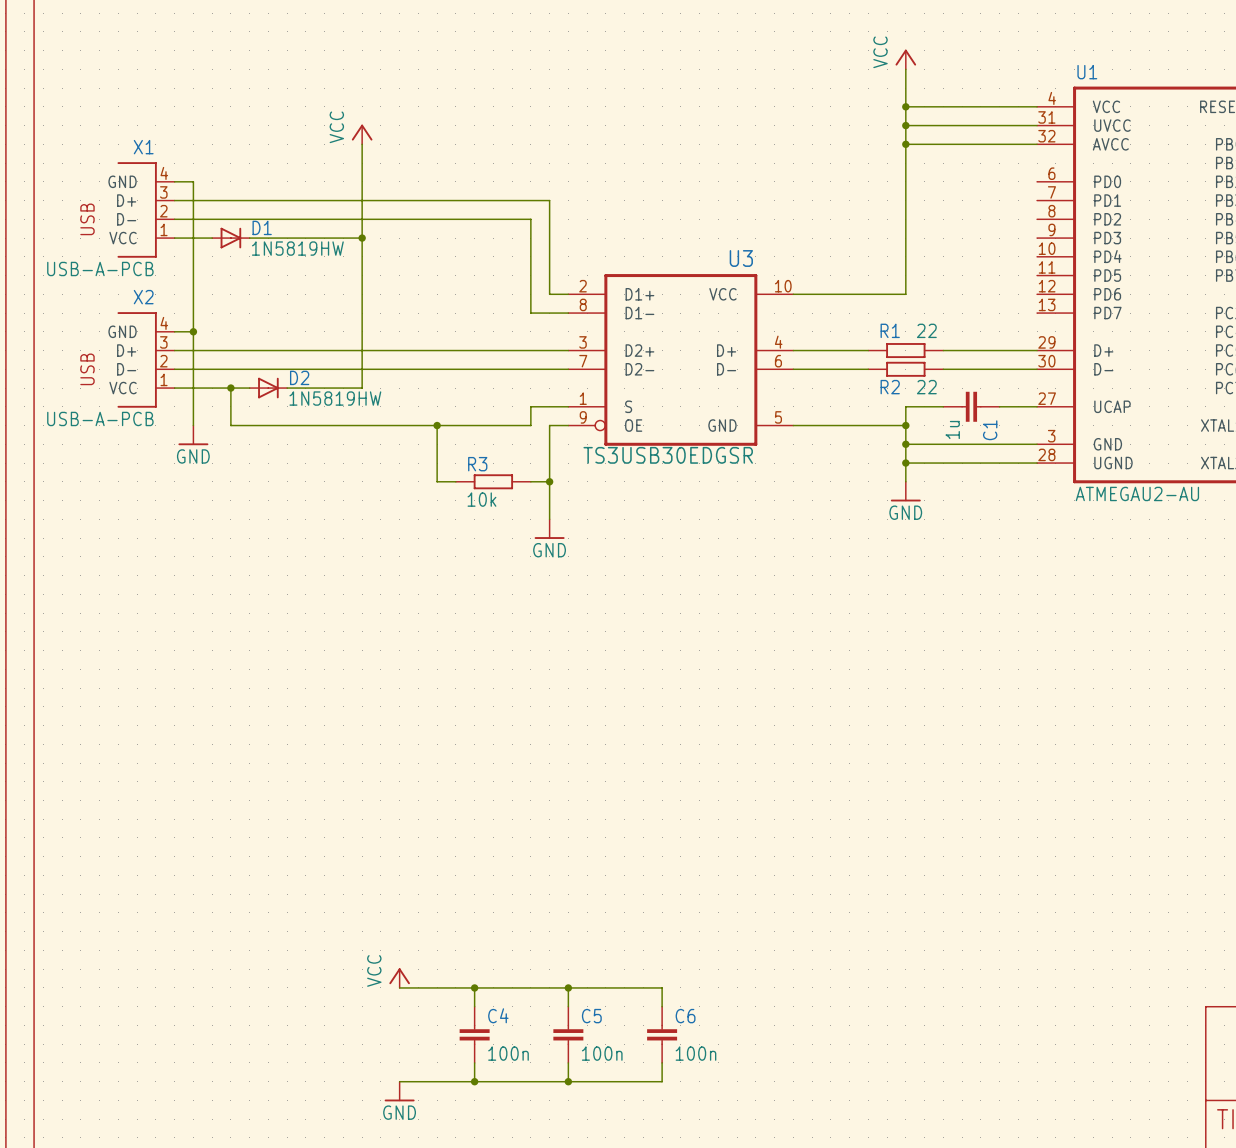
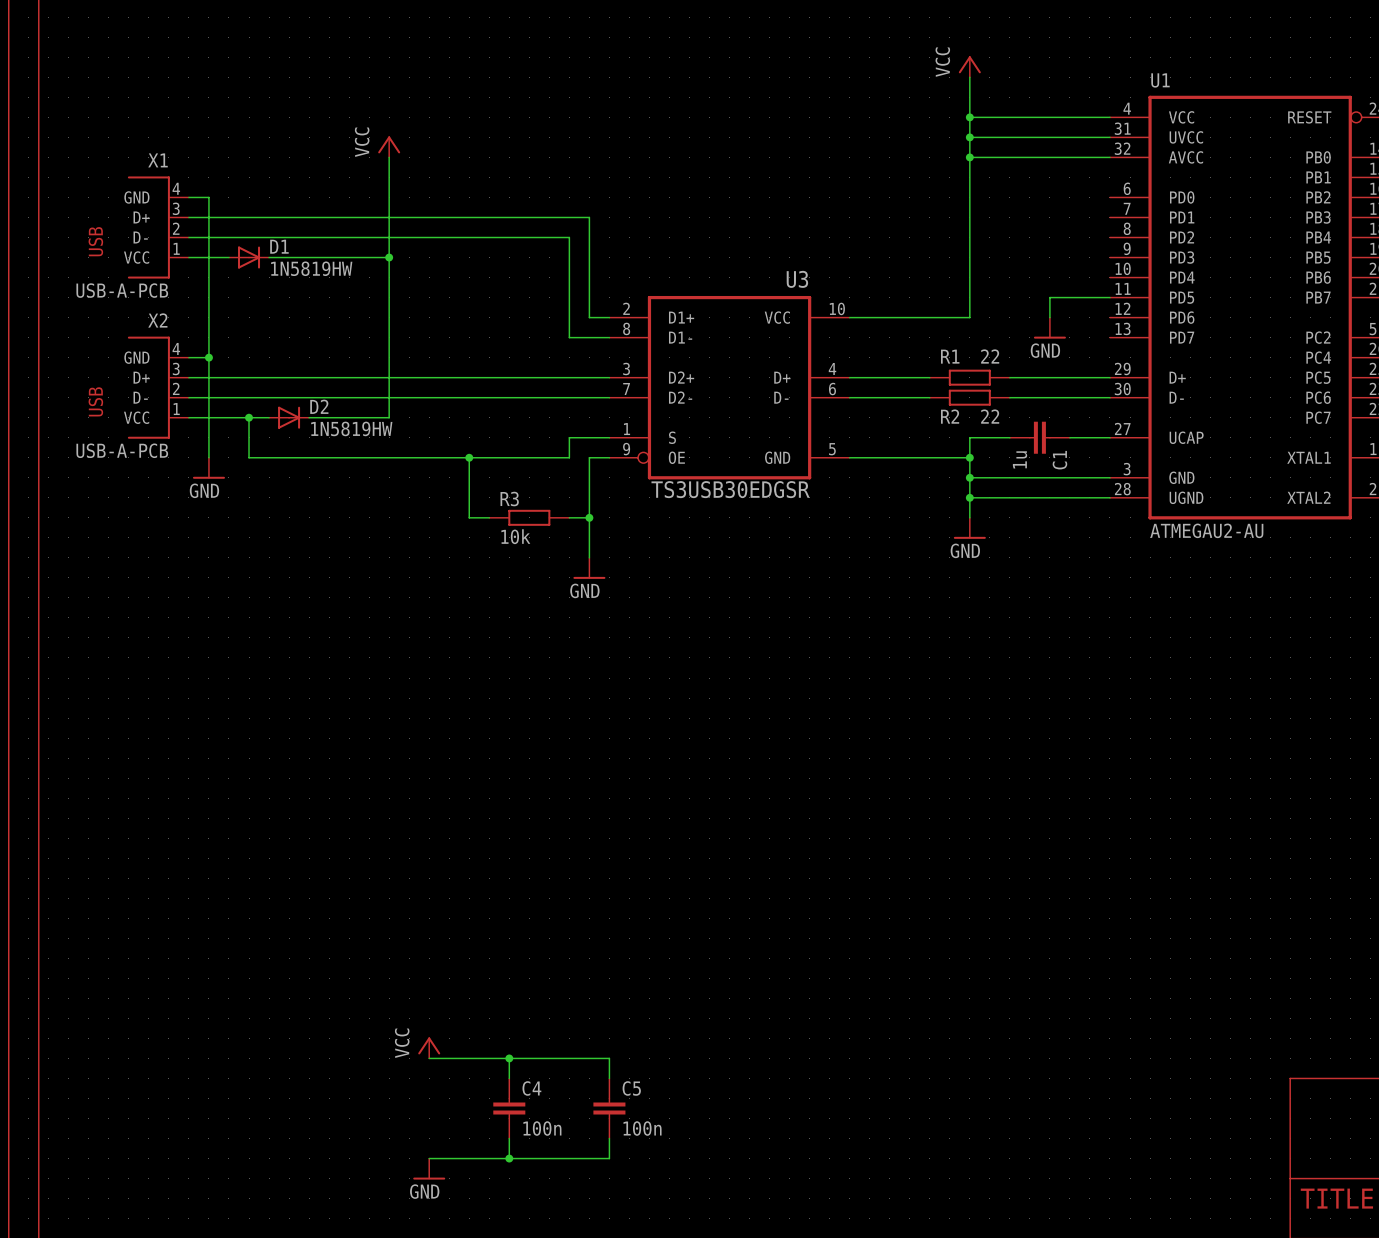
wire: none -> (1109, 297) (1049, 297) (1049, 317)
power symbol: none -> GND (1049, 328)
wire: (568, 987) (662, 987) (662, 1006) -> none
junction: (568, 987) -> none
C6: 100n (662, 1034) -> none
wire: (662, 1062) (662, 1081) (568, 1081) -> none
junction: (568, 1081) -> none

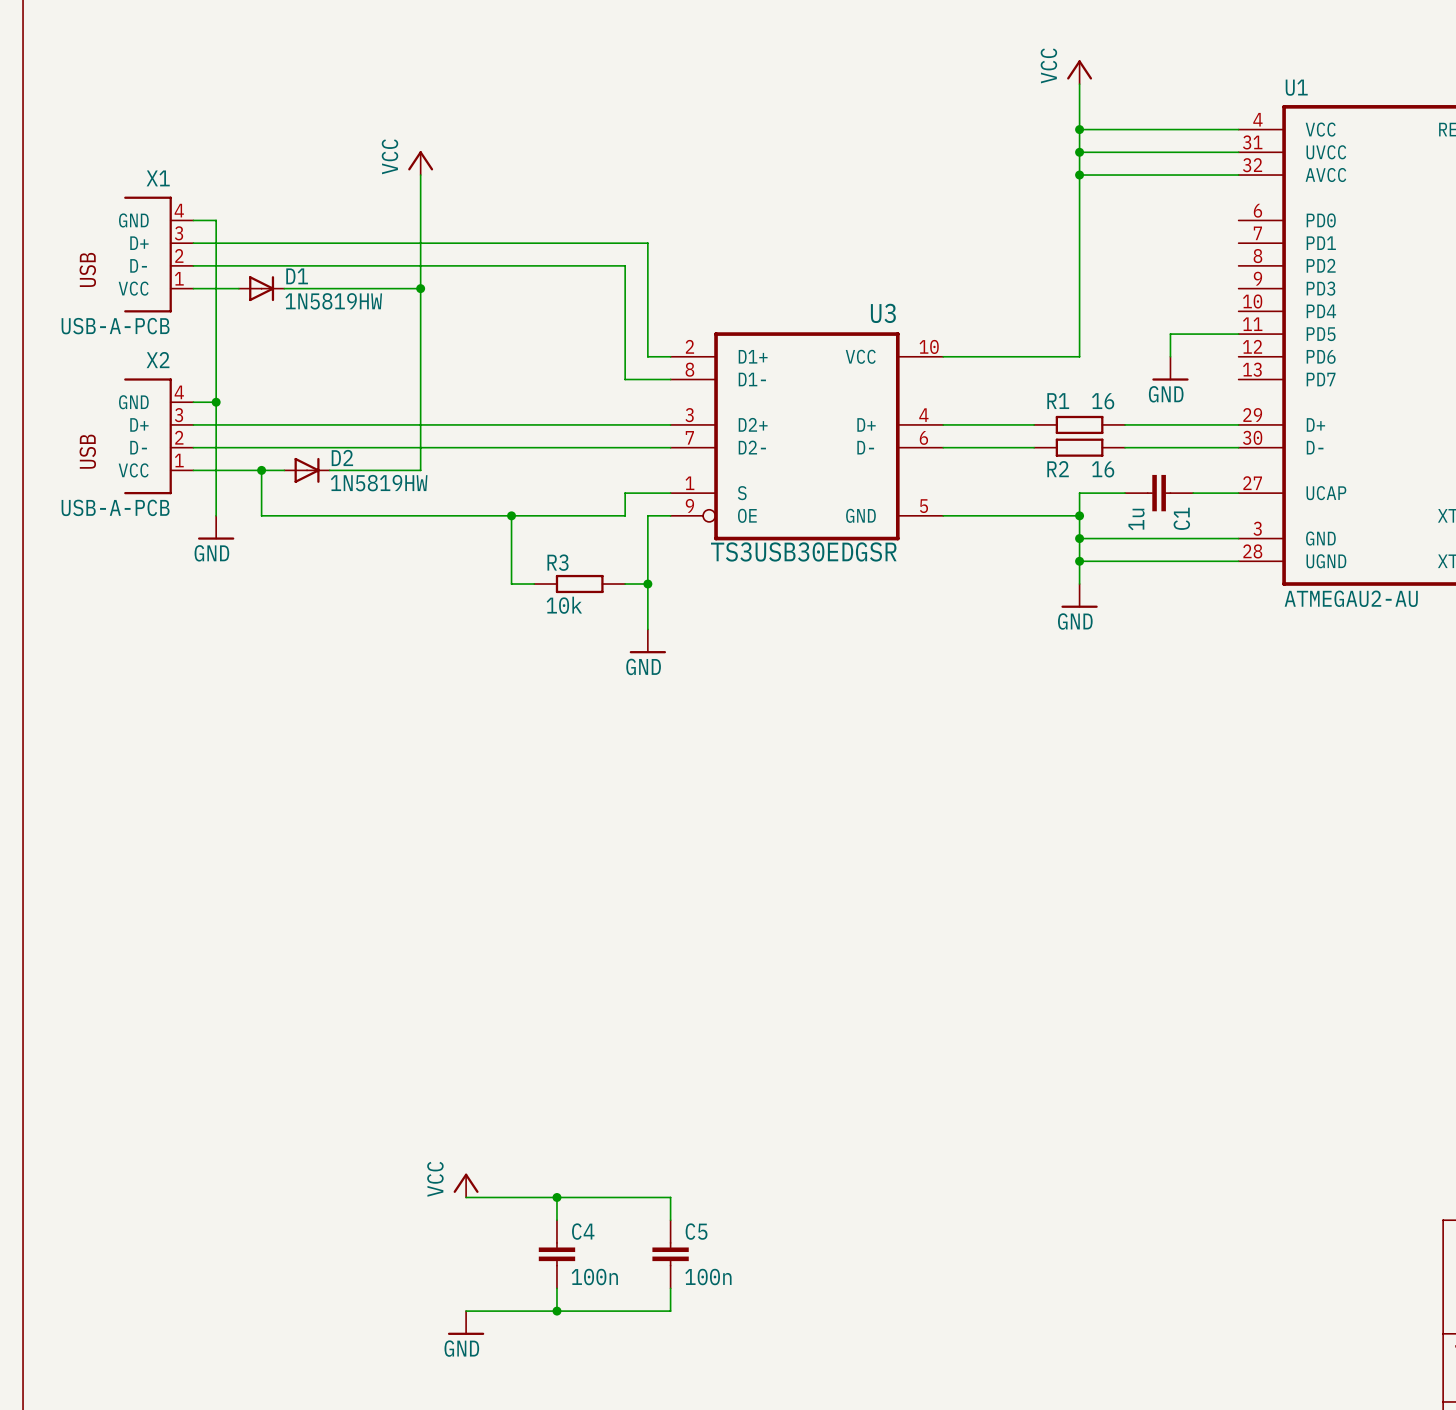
R1 value: 22 (990, 356) -> 16 (1103, 401)
R2 value: 22 (990, 416) -> 16 (1103, 469)

